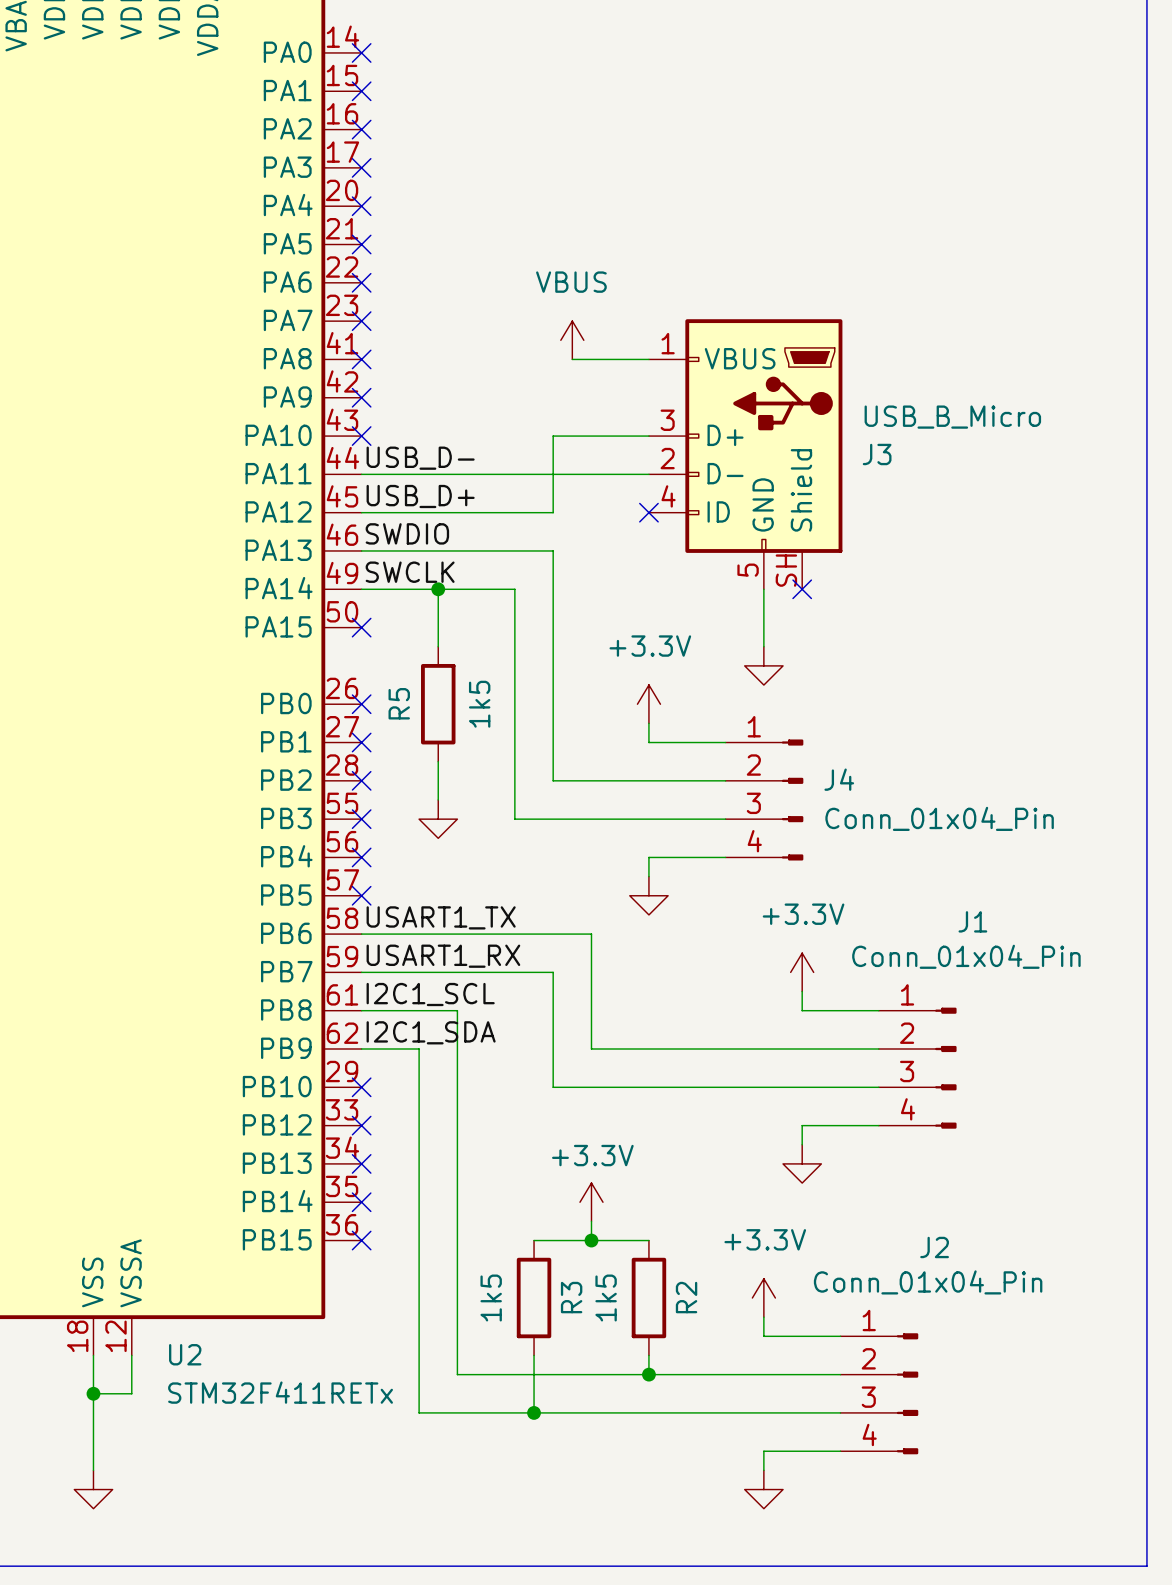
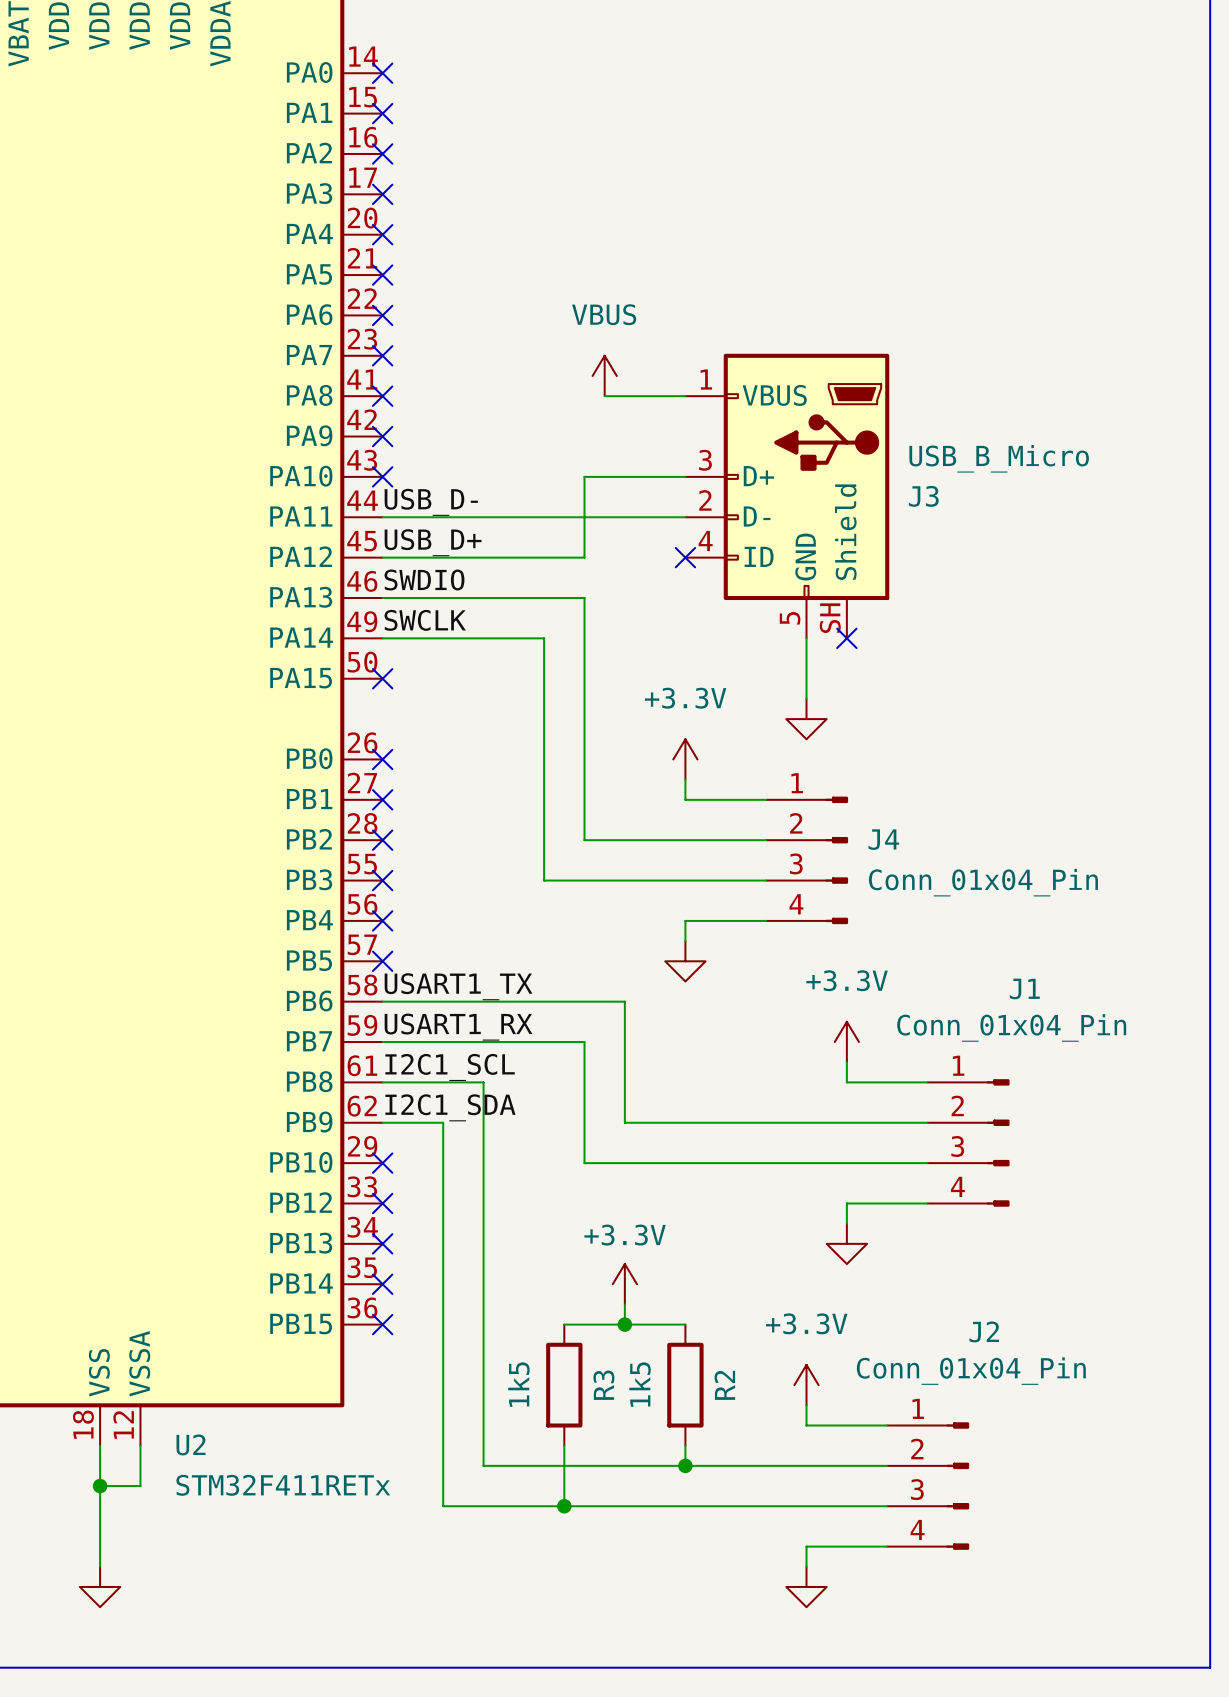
wire: (438, 589) (438, 646) -> none
junction: (438, 589) -> none
R5: 1k5 (438, 704) -> none
wire: (438, 761) (438, 799) -> none
power symbol: (438, 819) -> none

